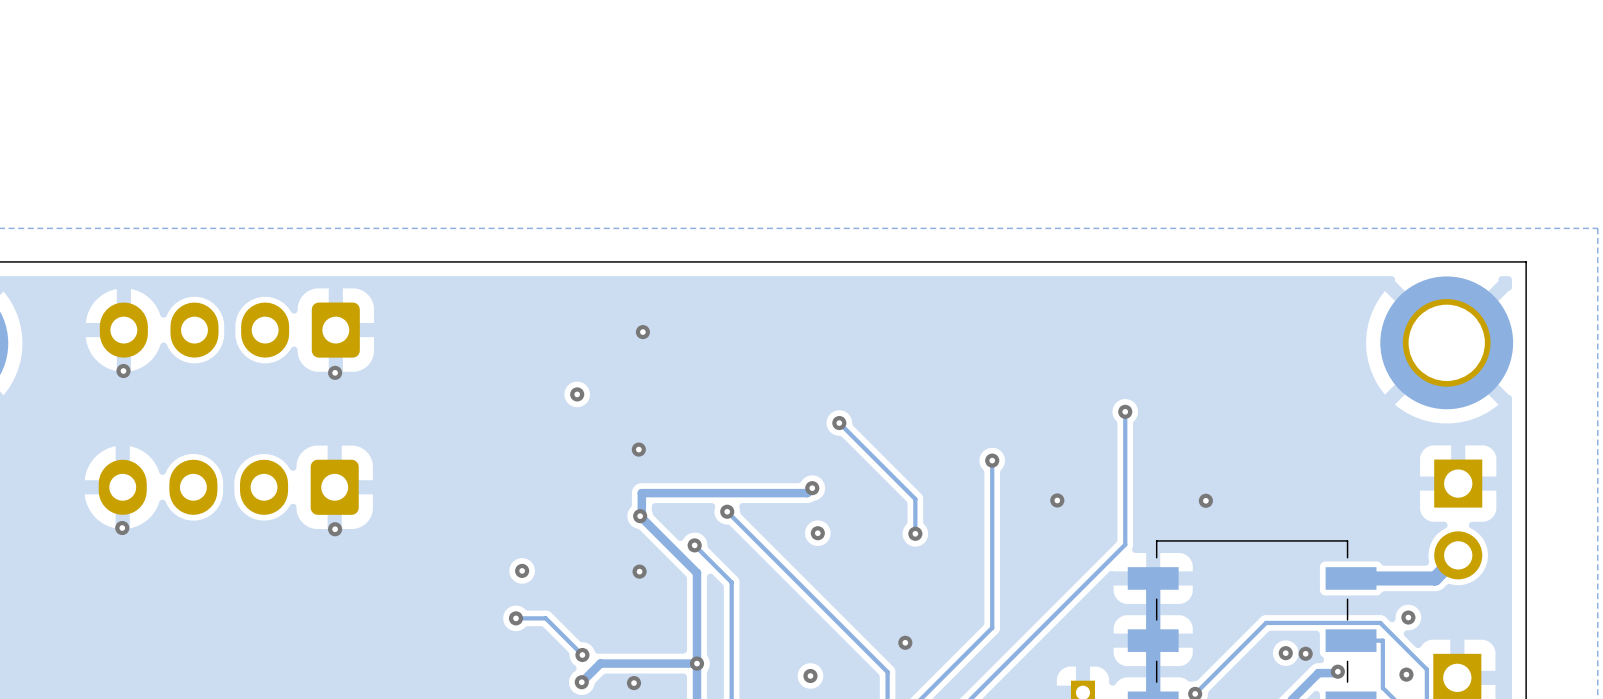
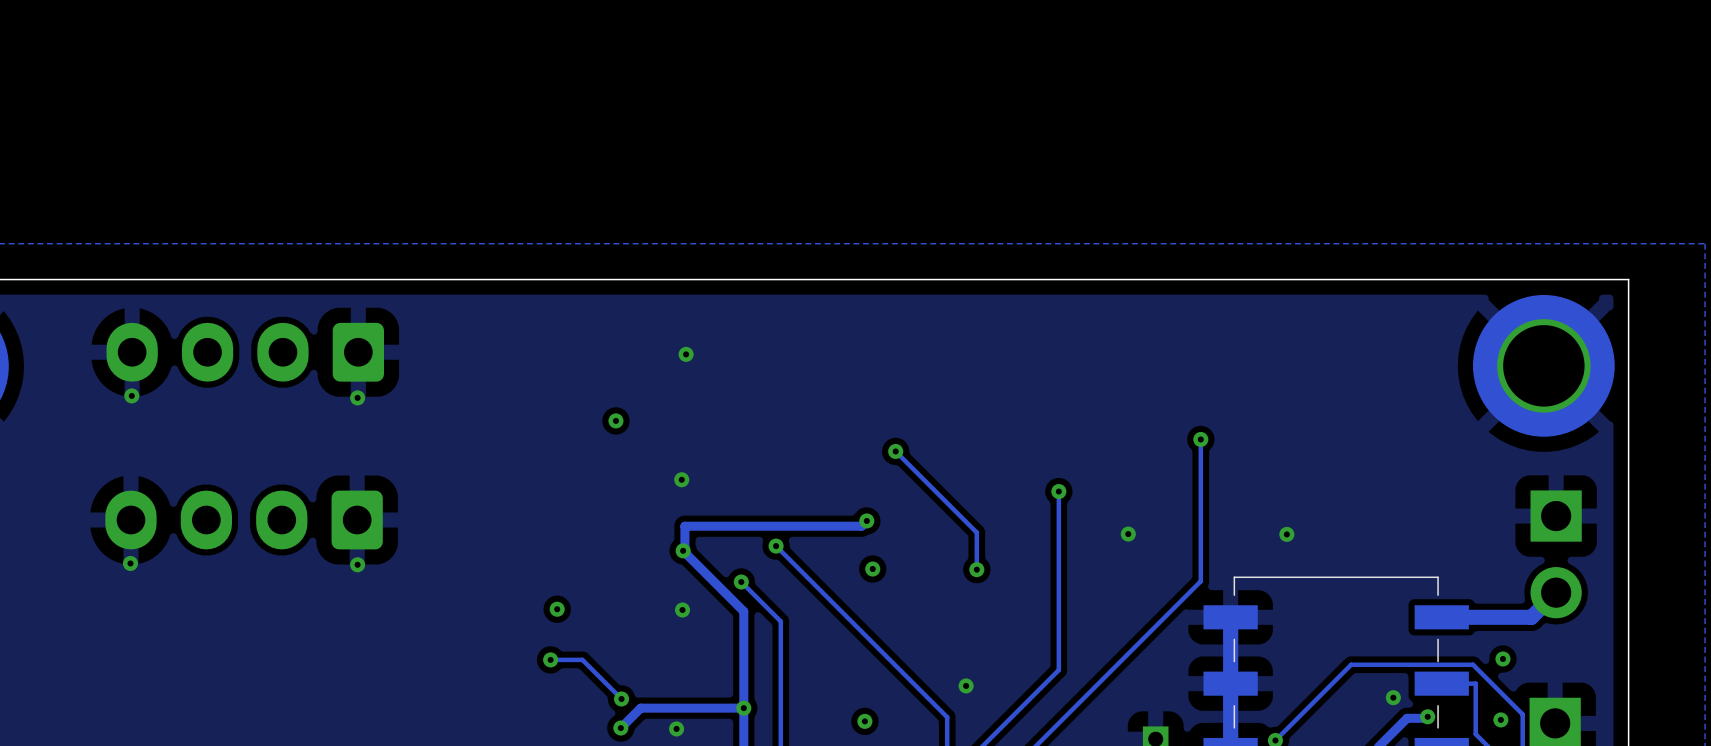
via: (1285, 653) -> none

